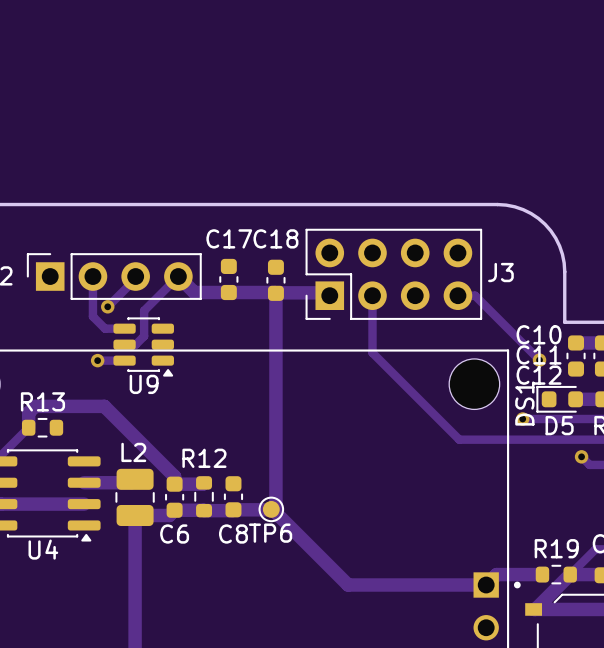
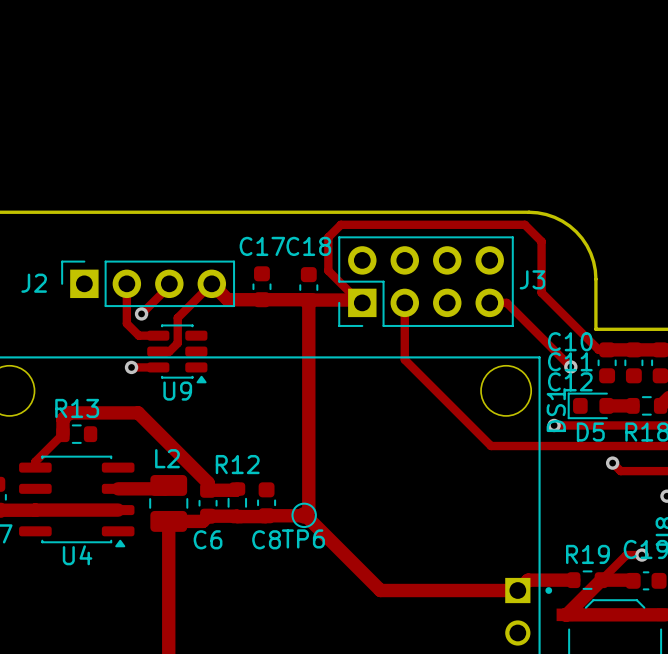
track: none -> (362, 302) (328, 270) (328, 237) (340, 224) (524, 224) (541, 241) (541, 292) (598, 349) (607, 349)

